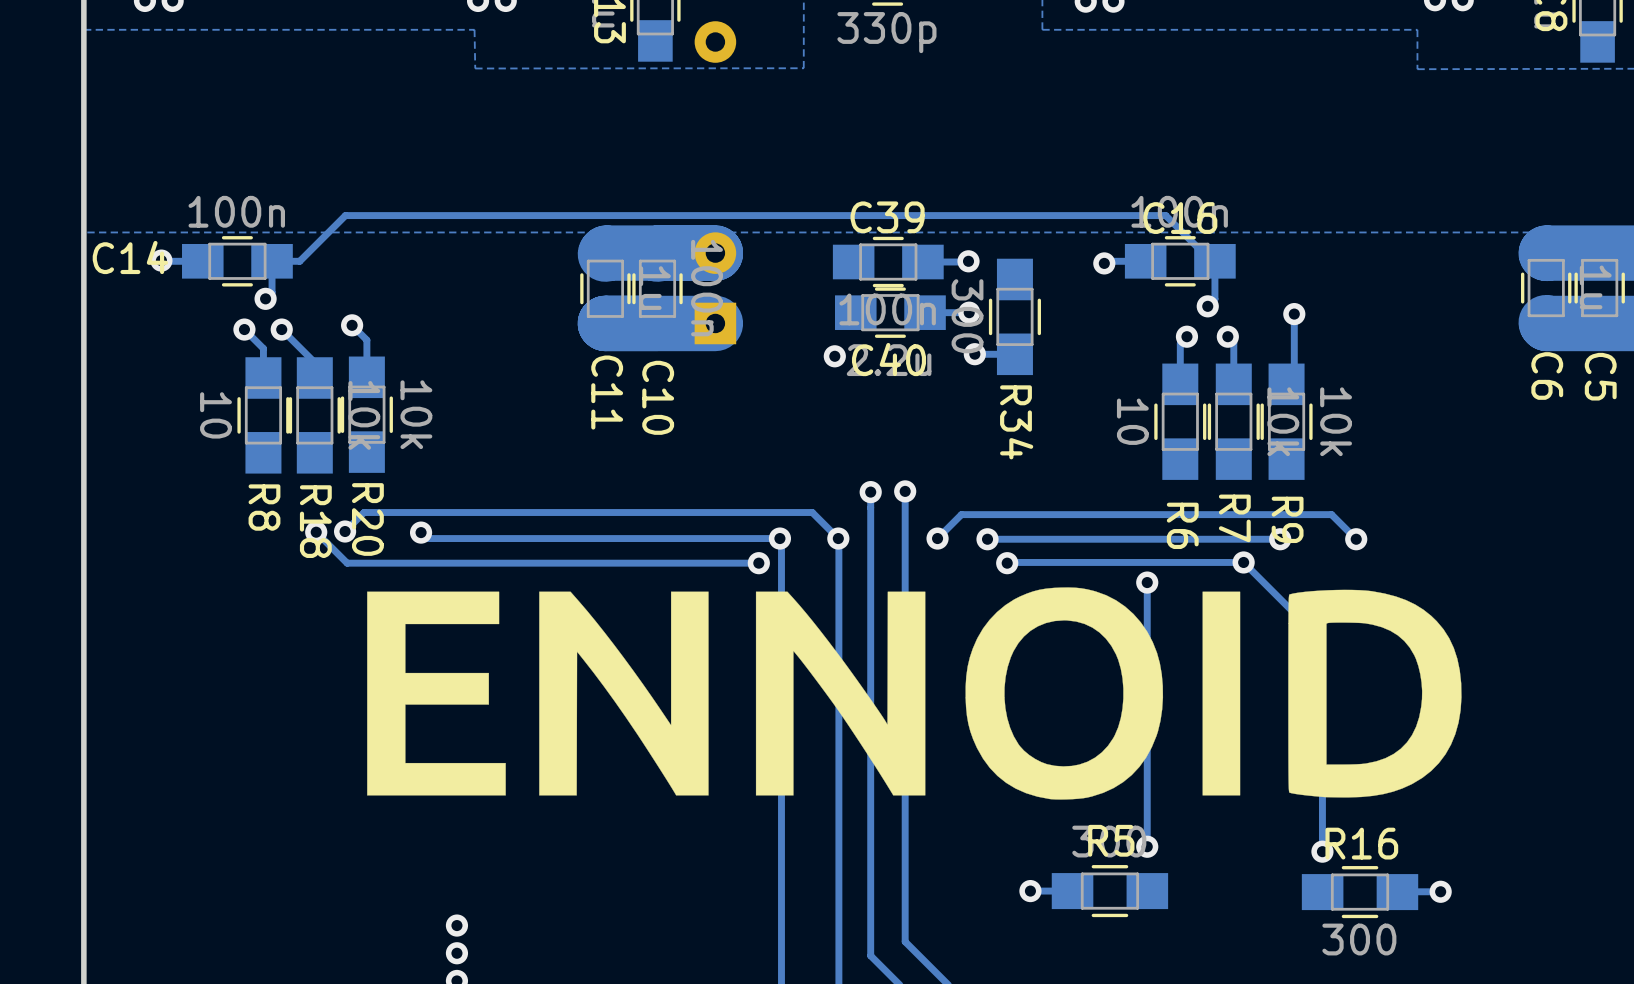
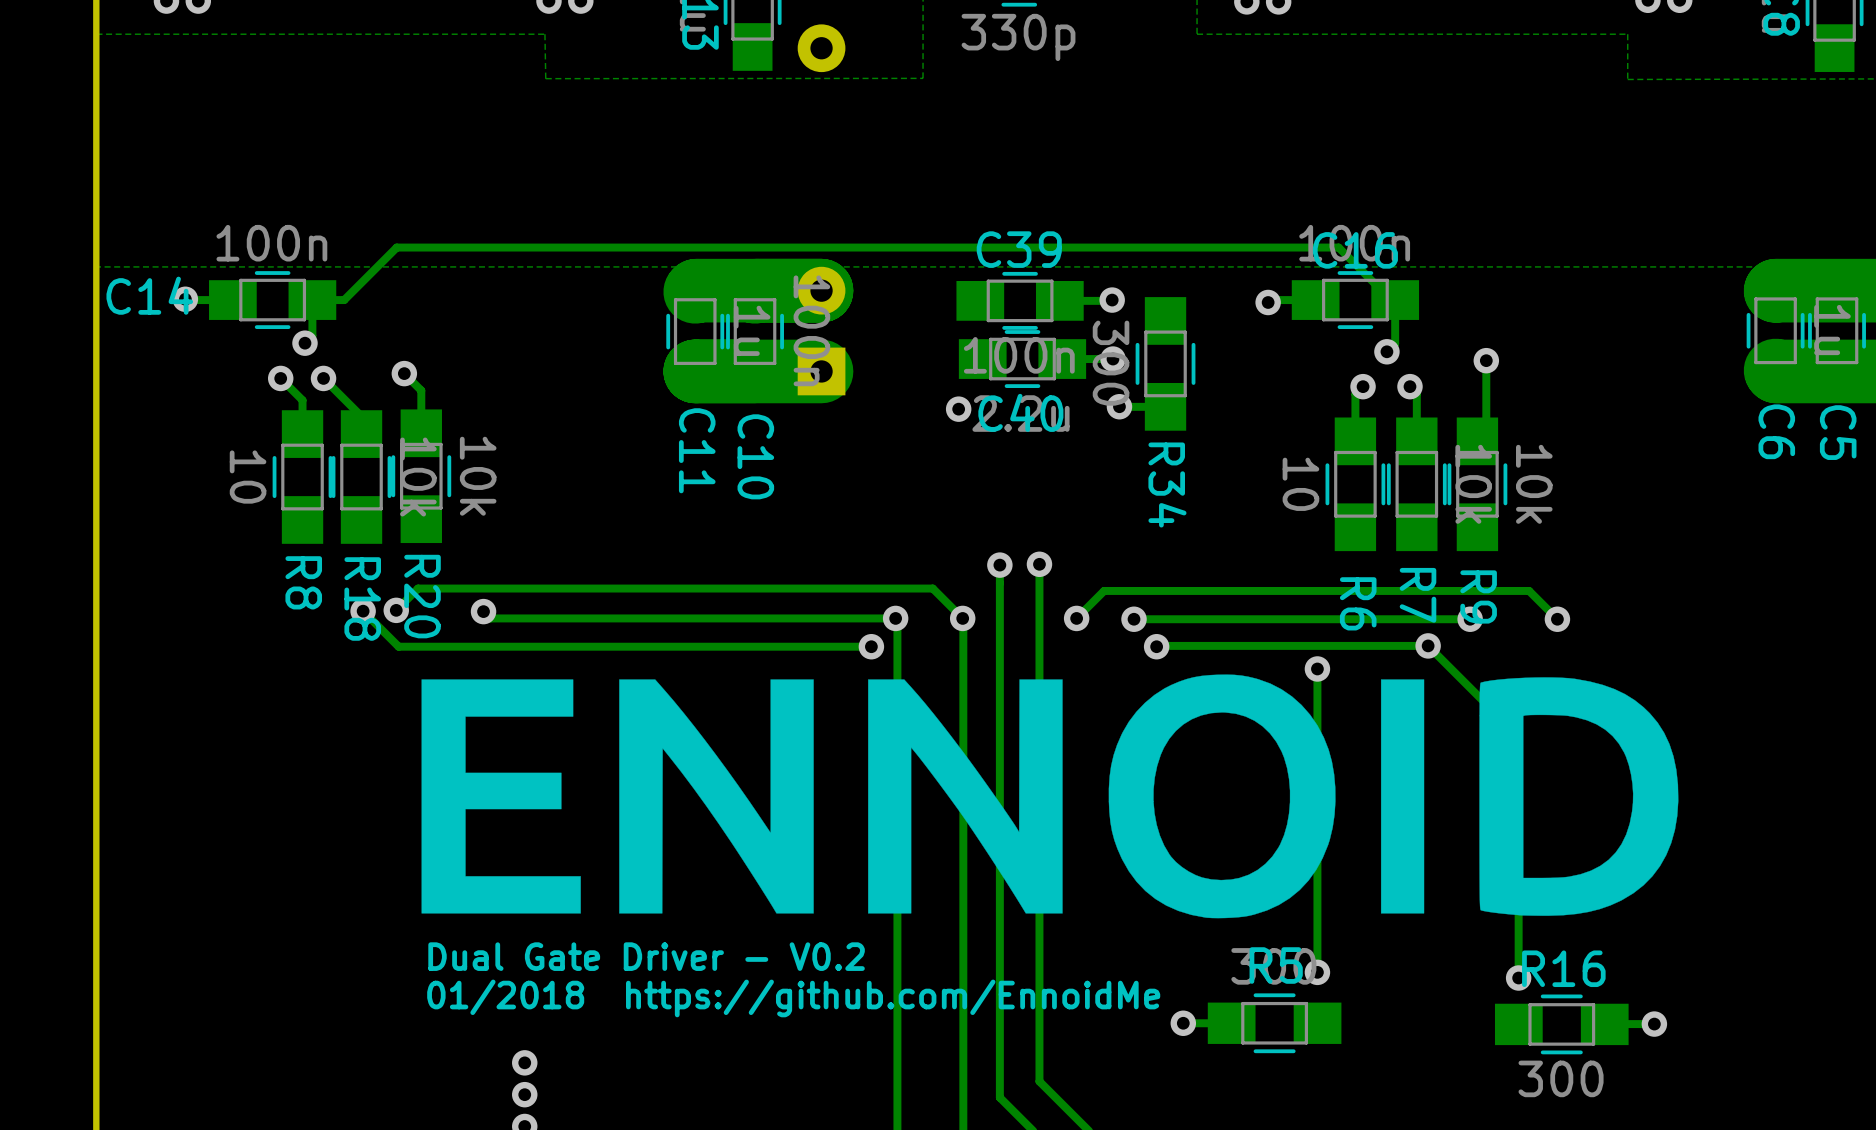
text: none -> Dual Gate Driver - V0.2 (646, 956)
text: none -> 01/2018 https://github.com/EnnoidMe (793, 998)

